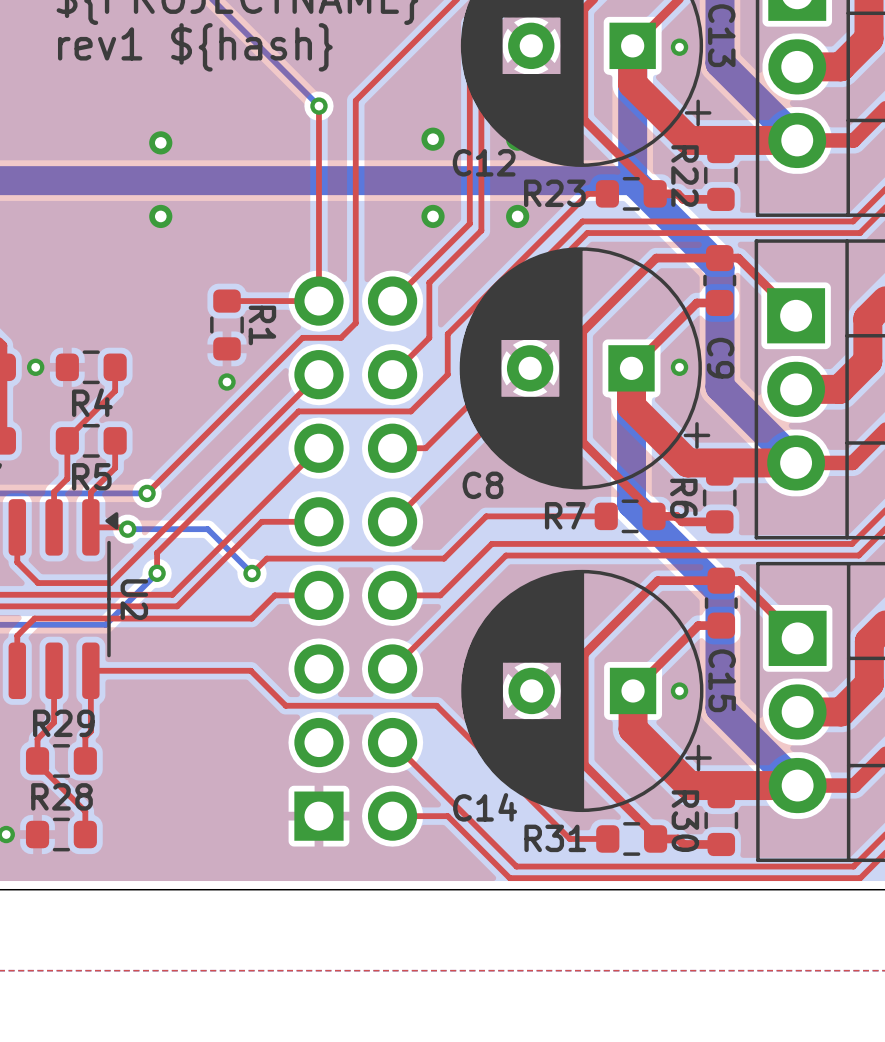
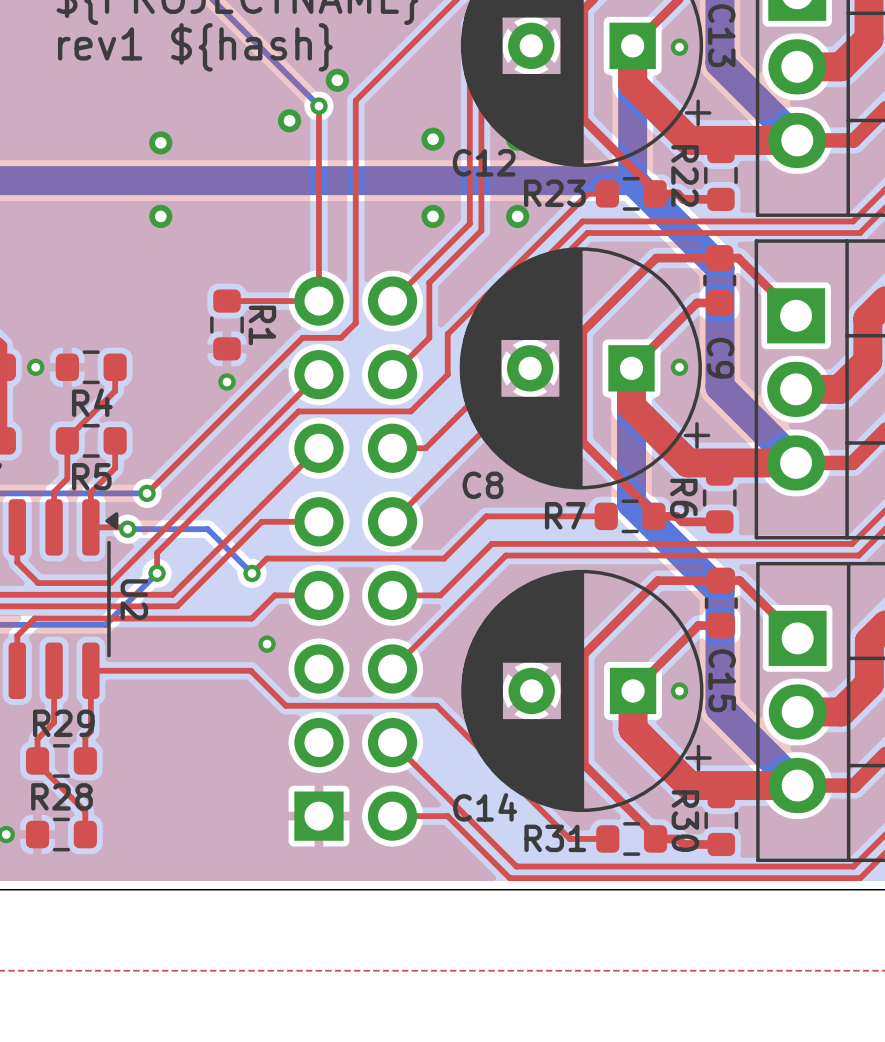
via: none -> (337, 80)
via: none -> (289, 120)
via: none -> (267, 644)

